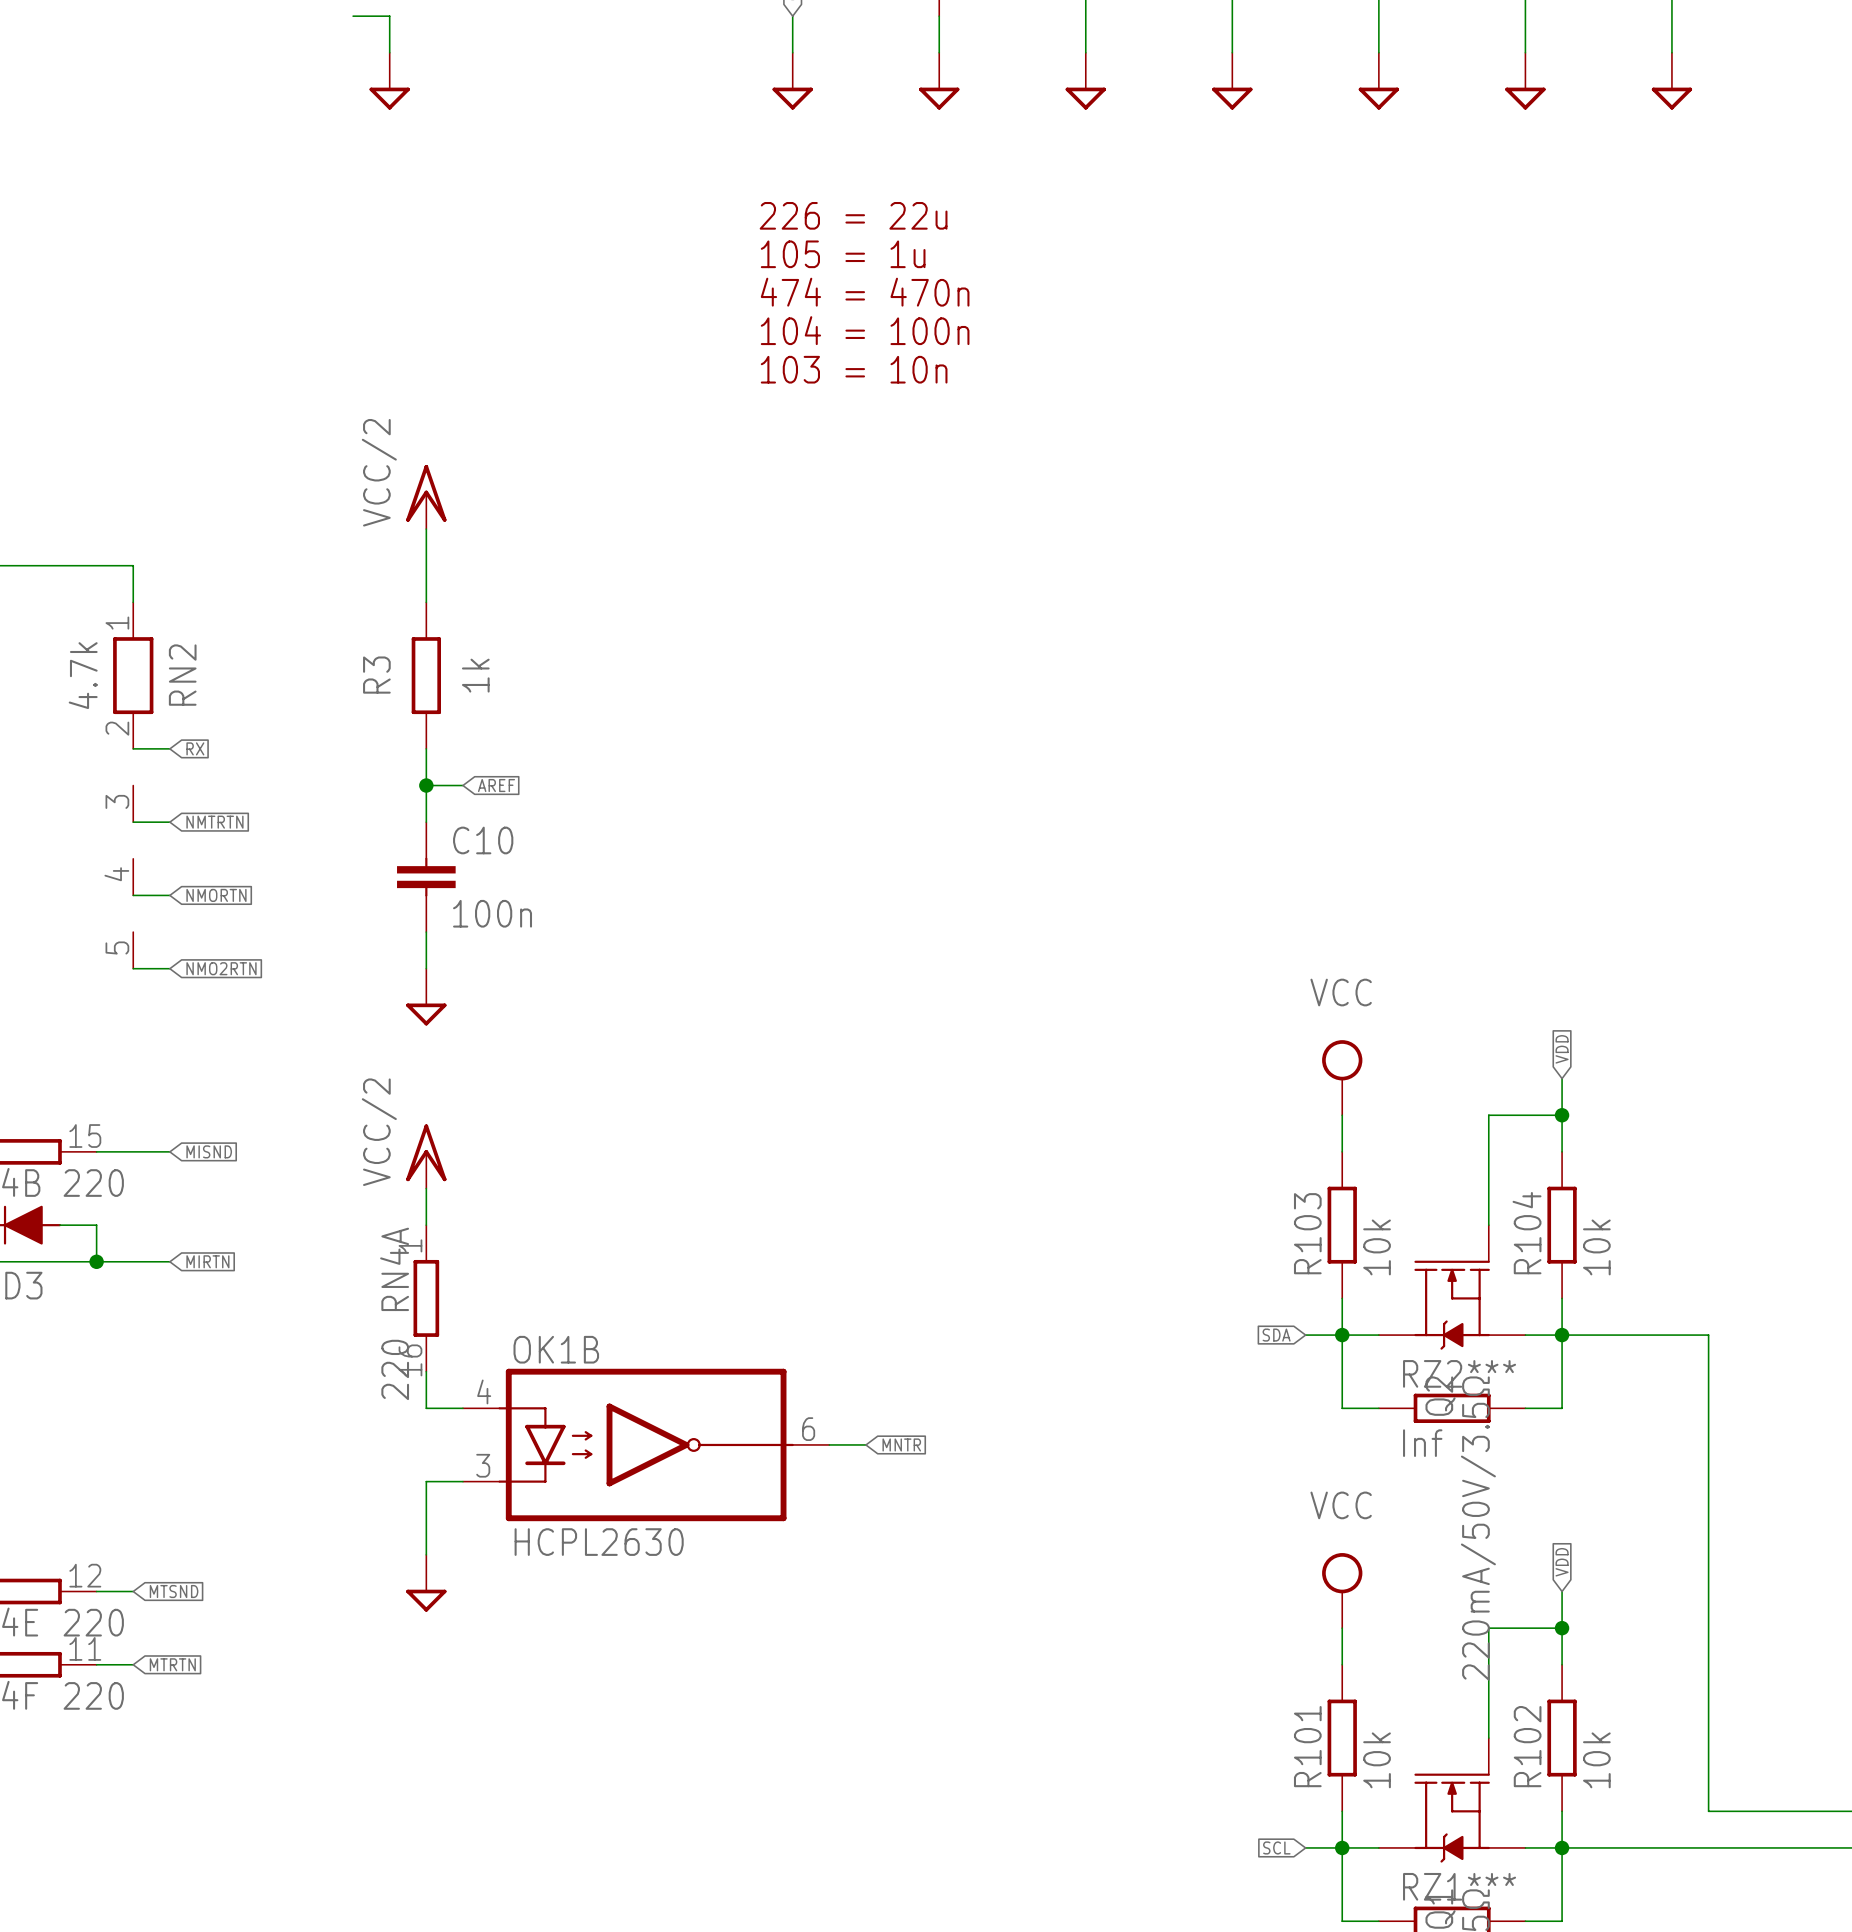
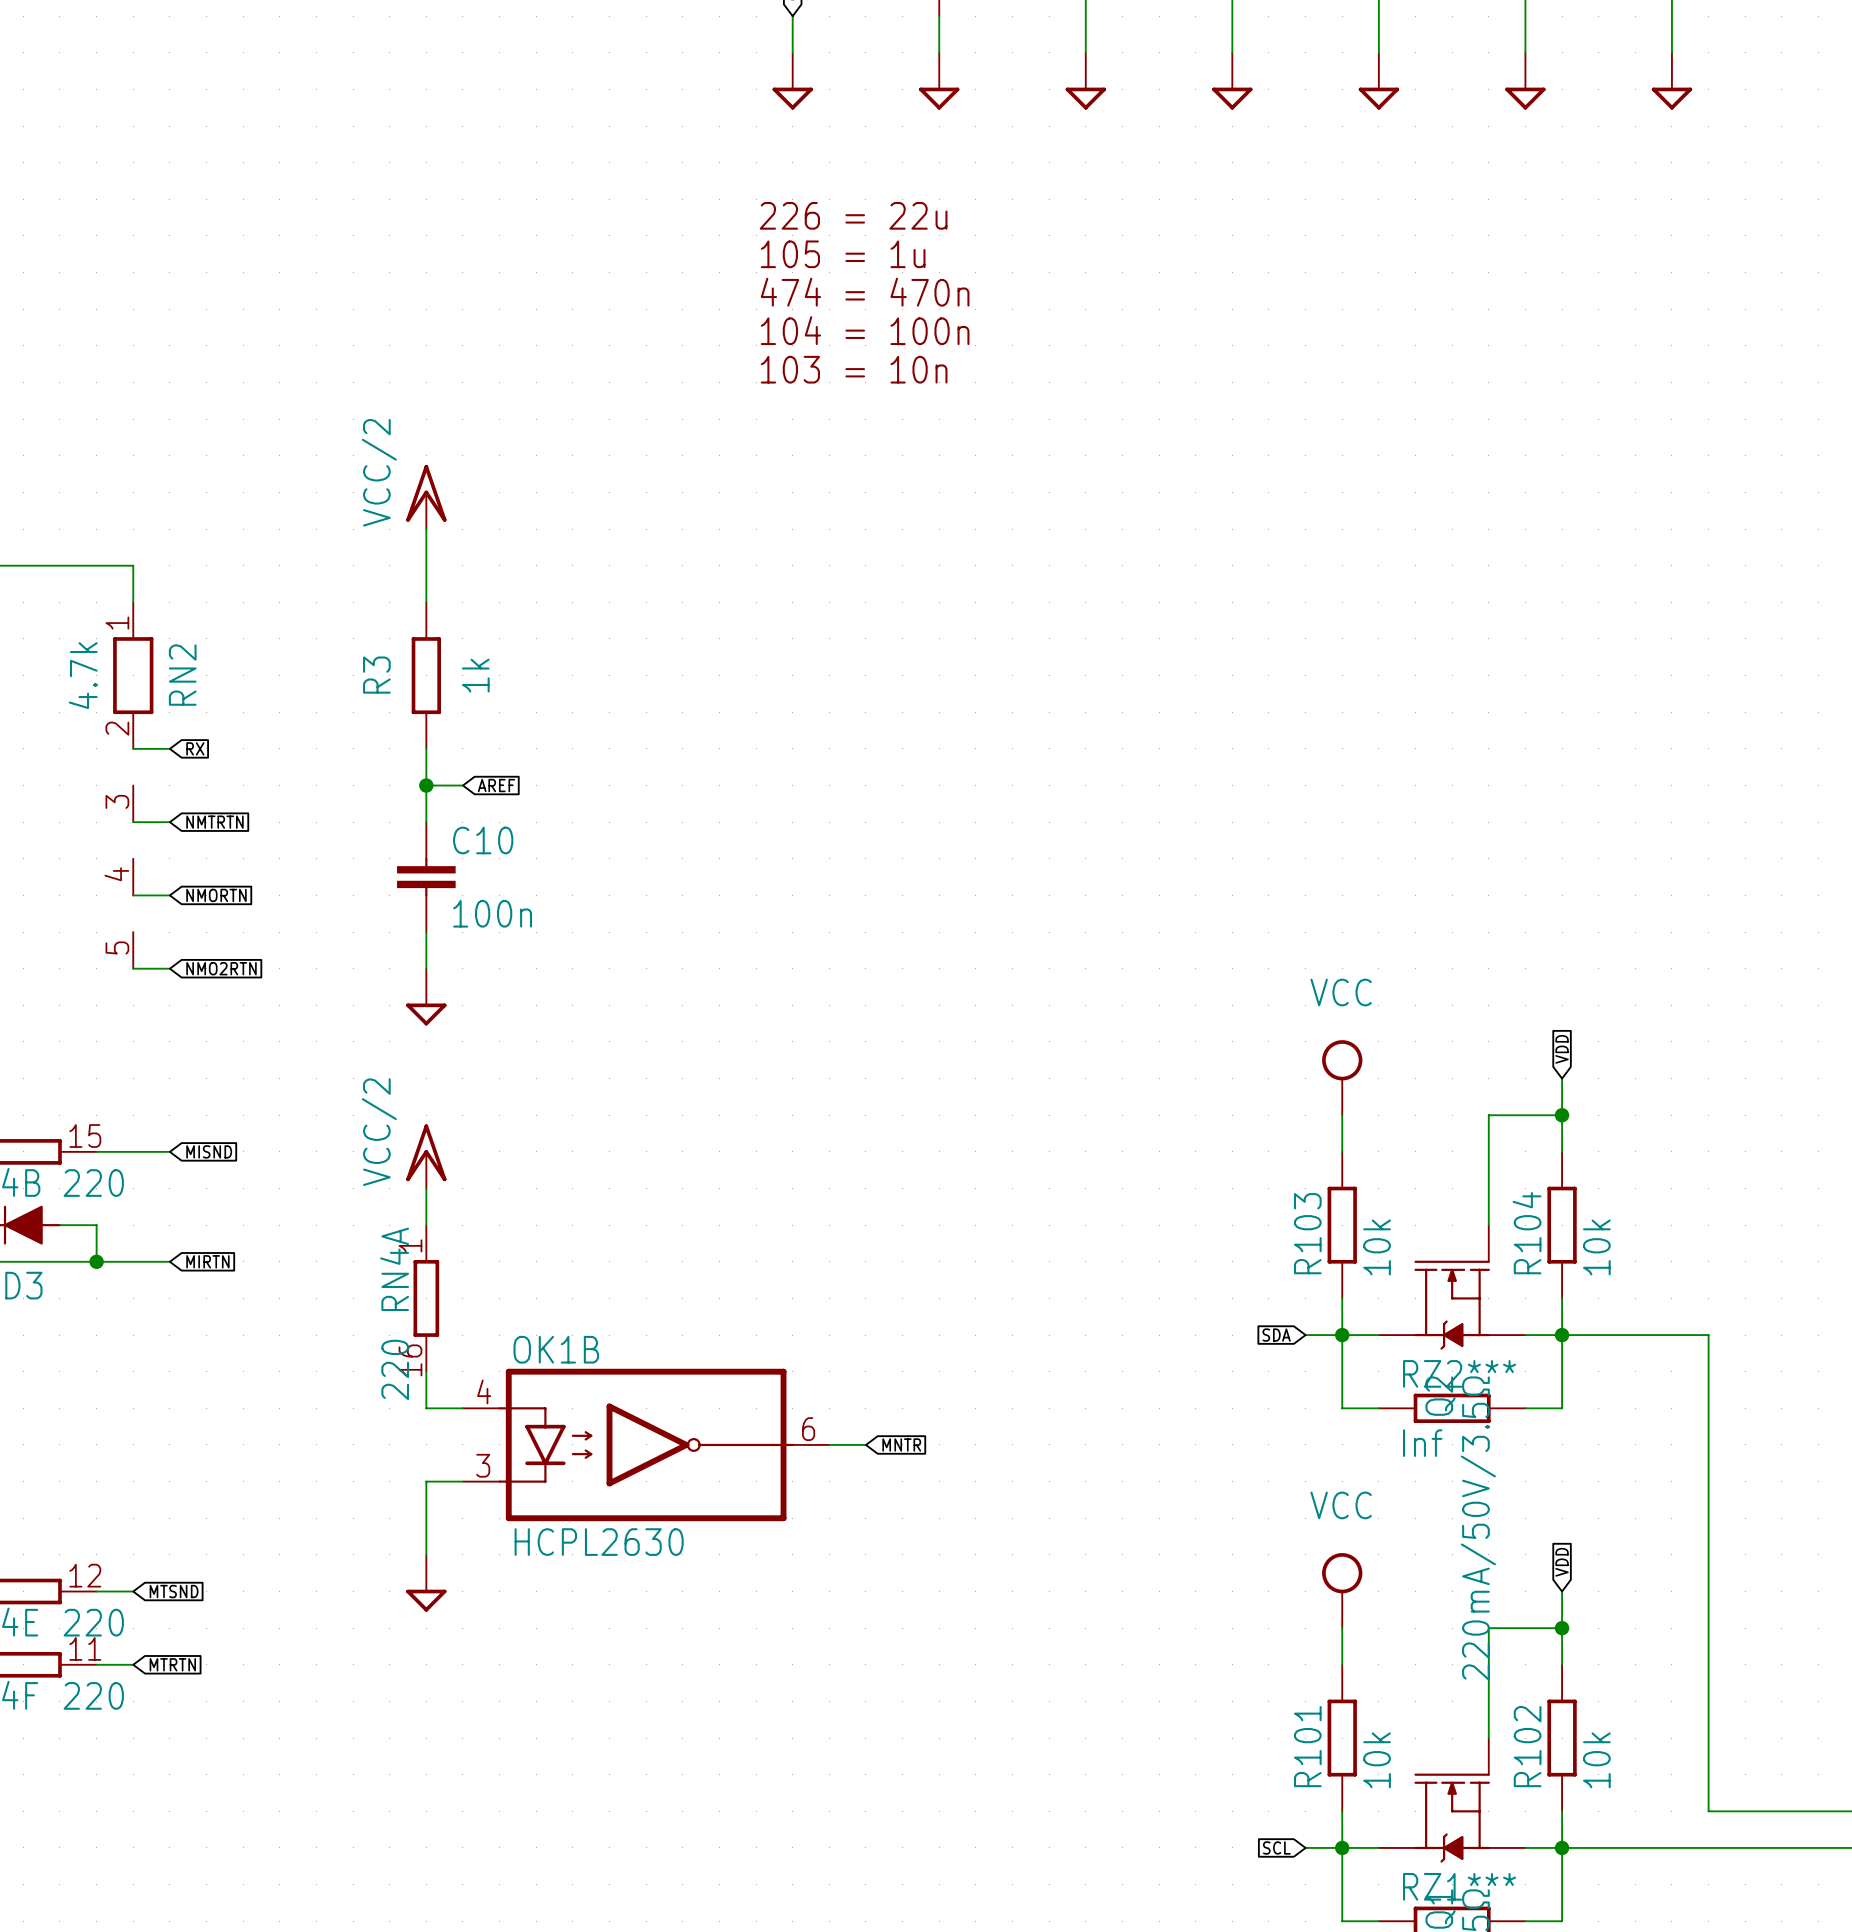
wire: (353, 16) (389, 16) (389, 52) -> none
power symbol: (389, 81) -> none

